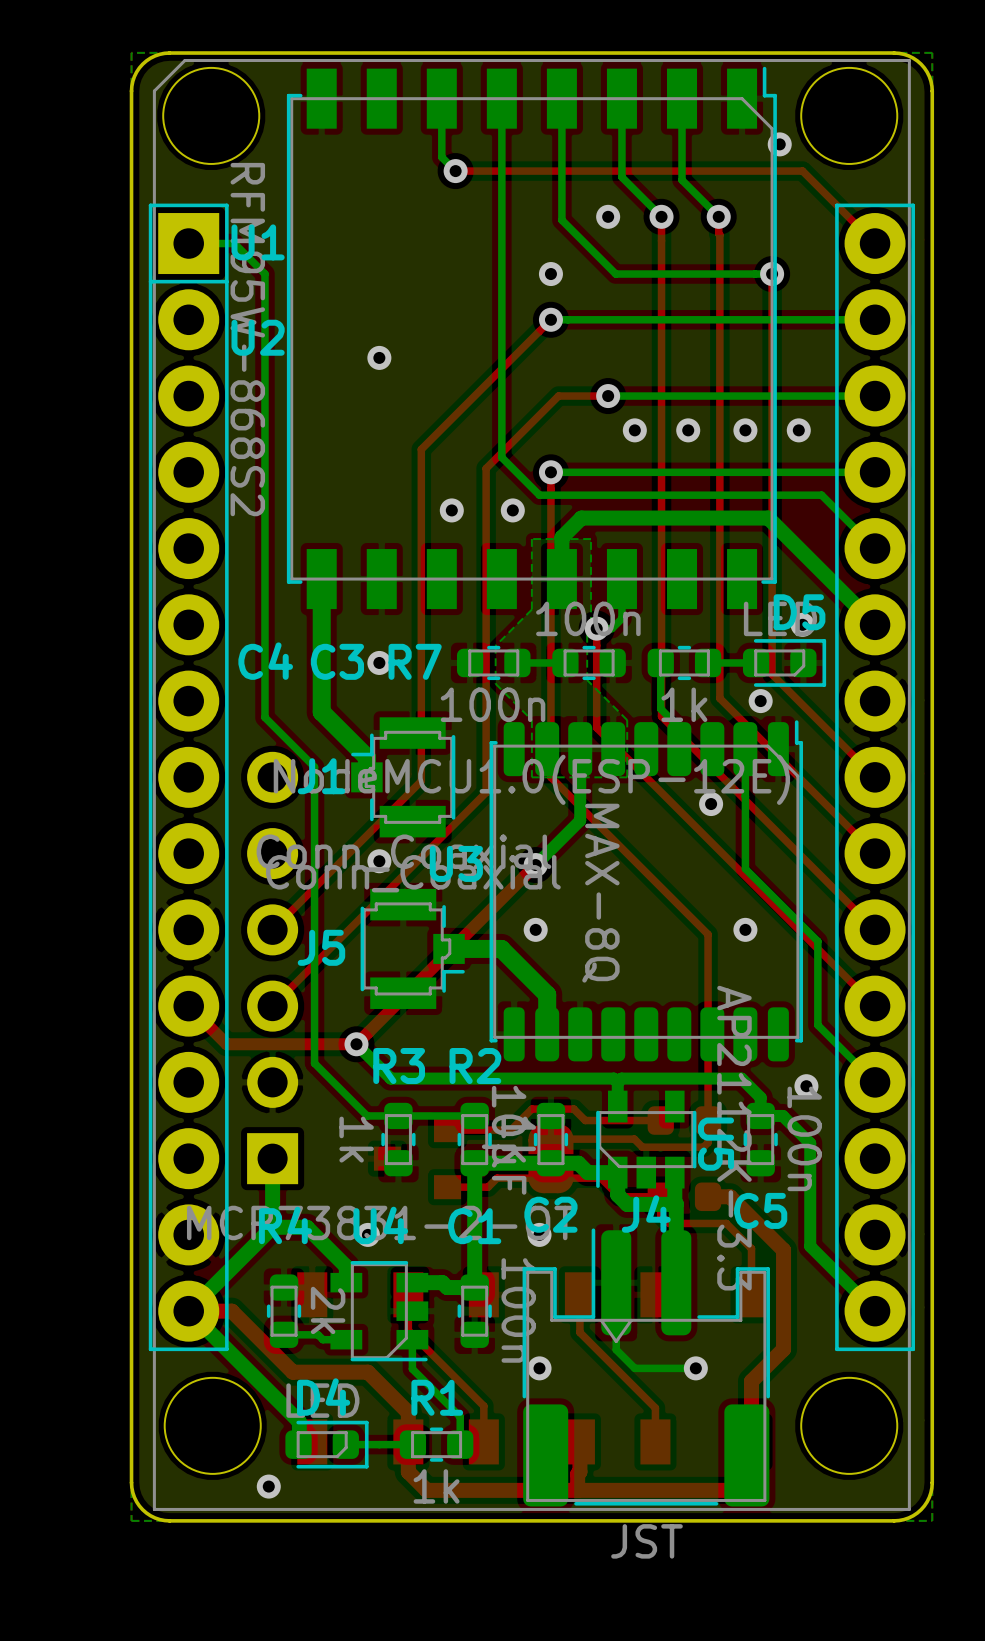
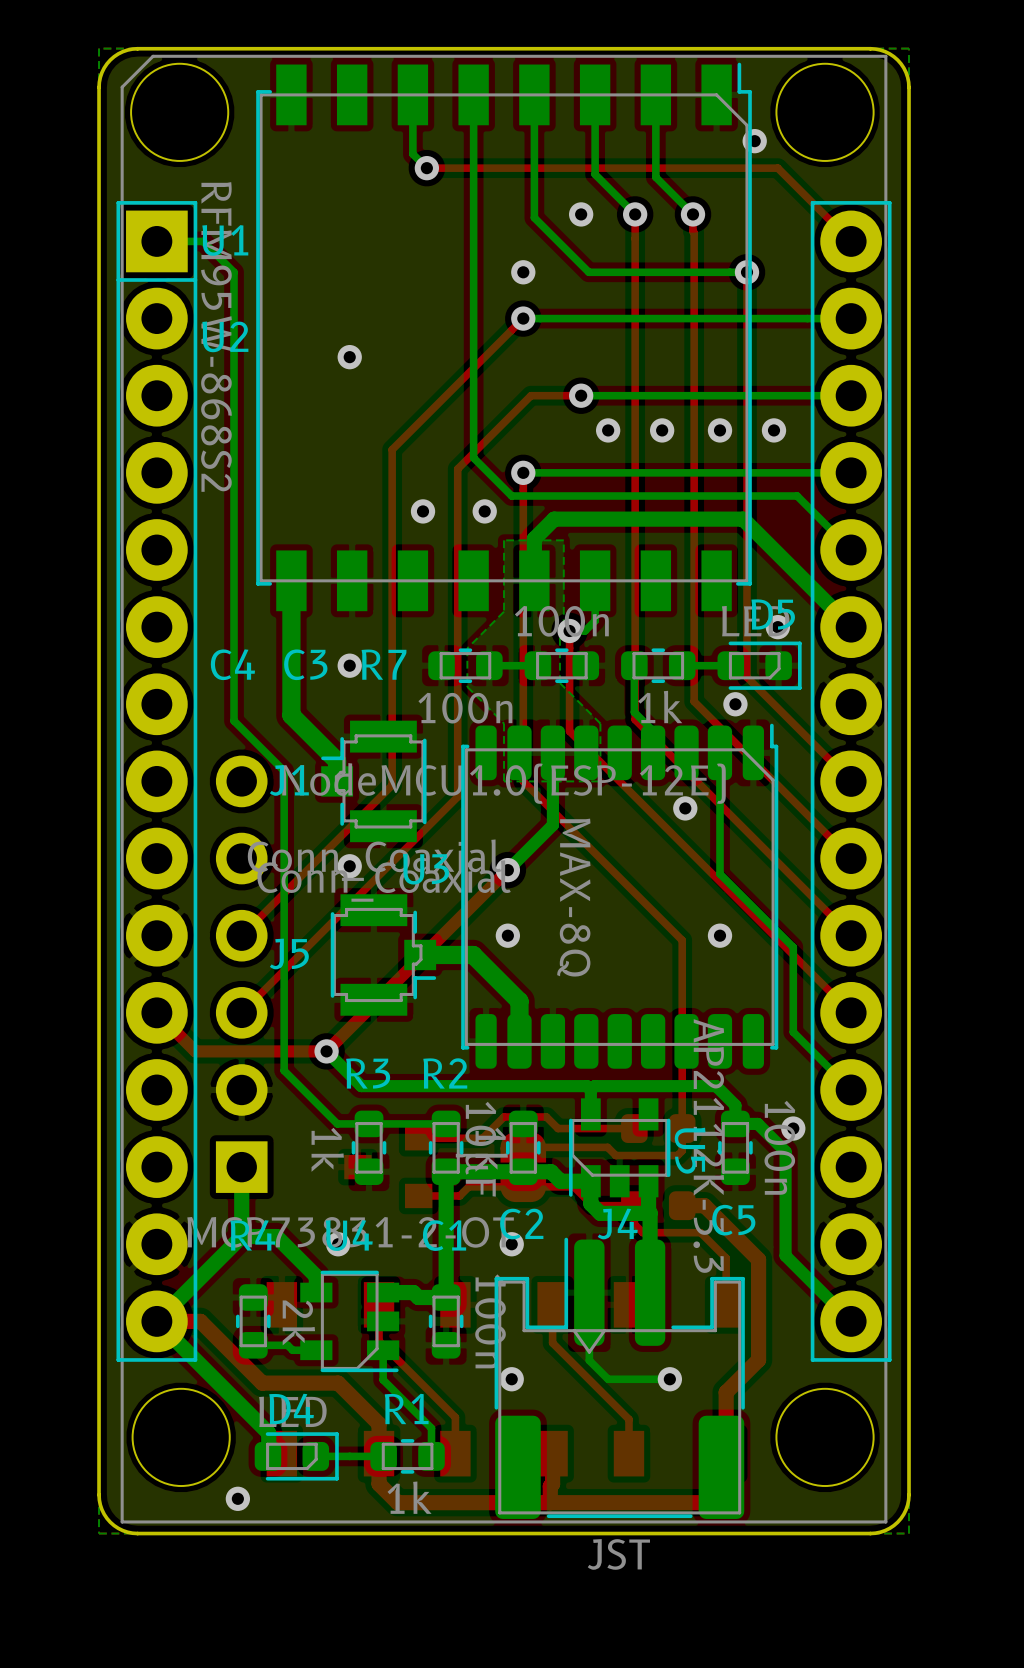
via position: (806, 1086) -> (793, 1128)

